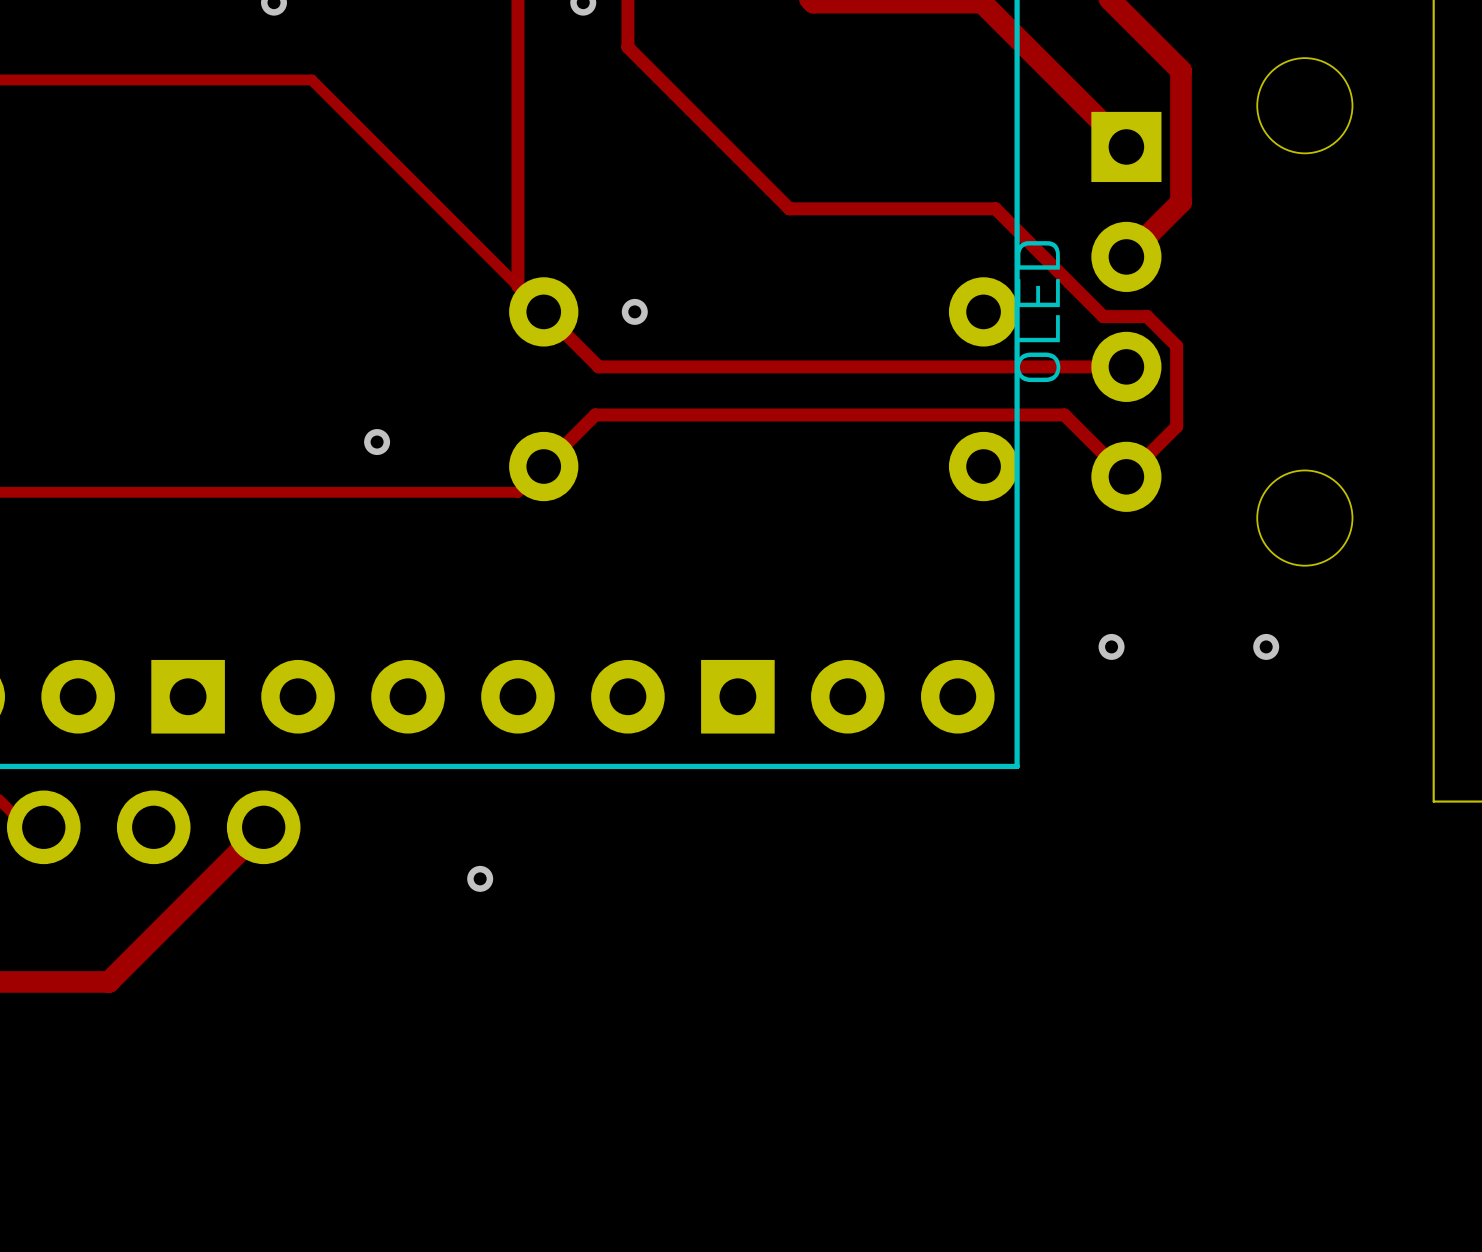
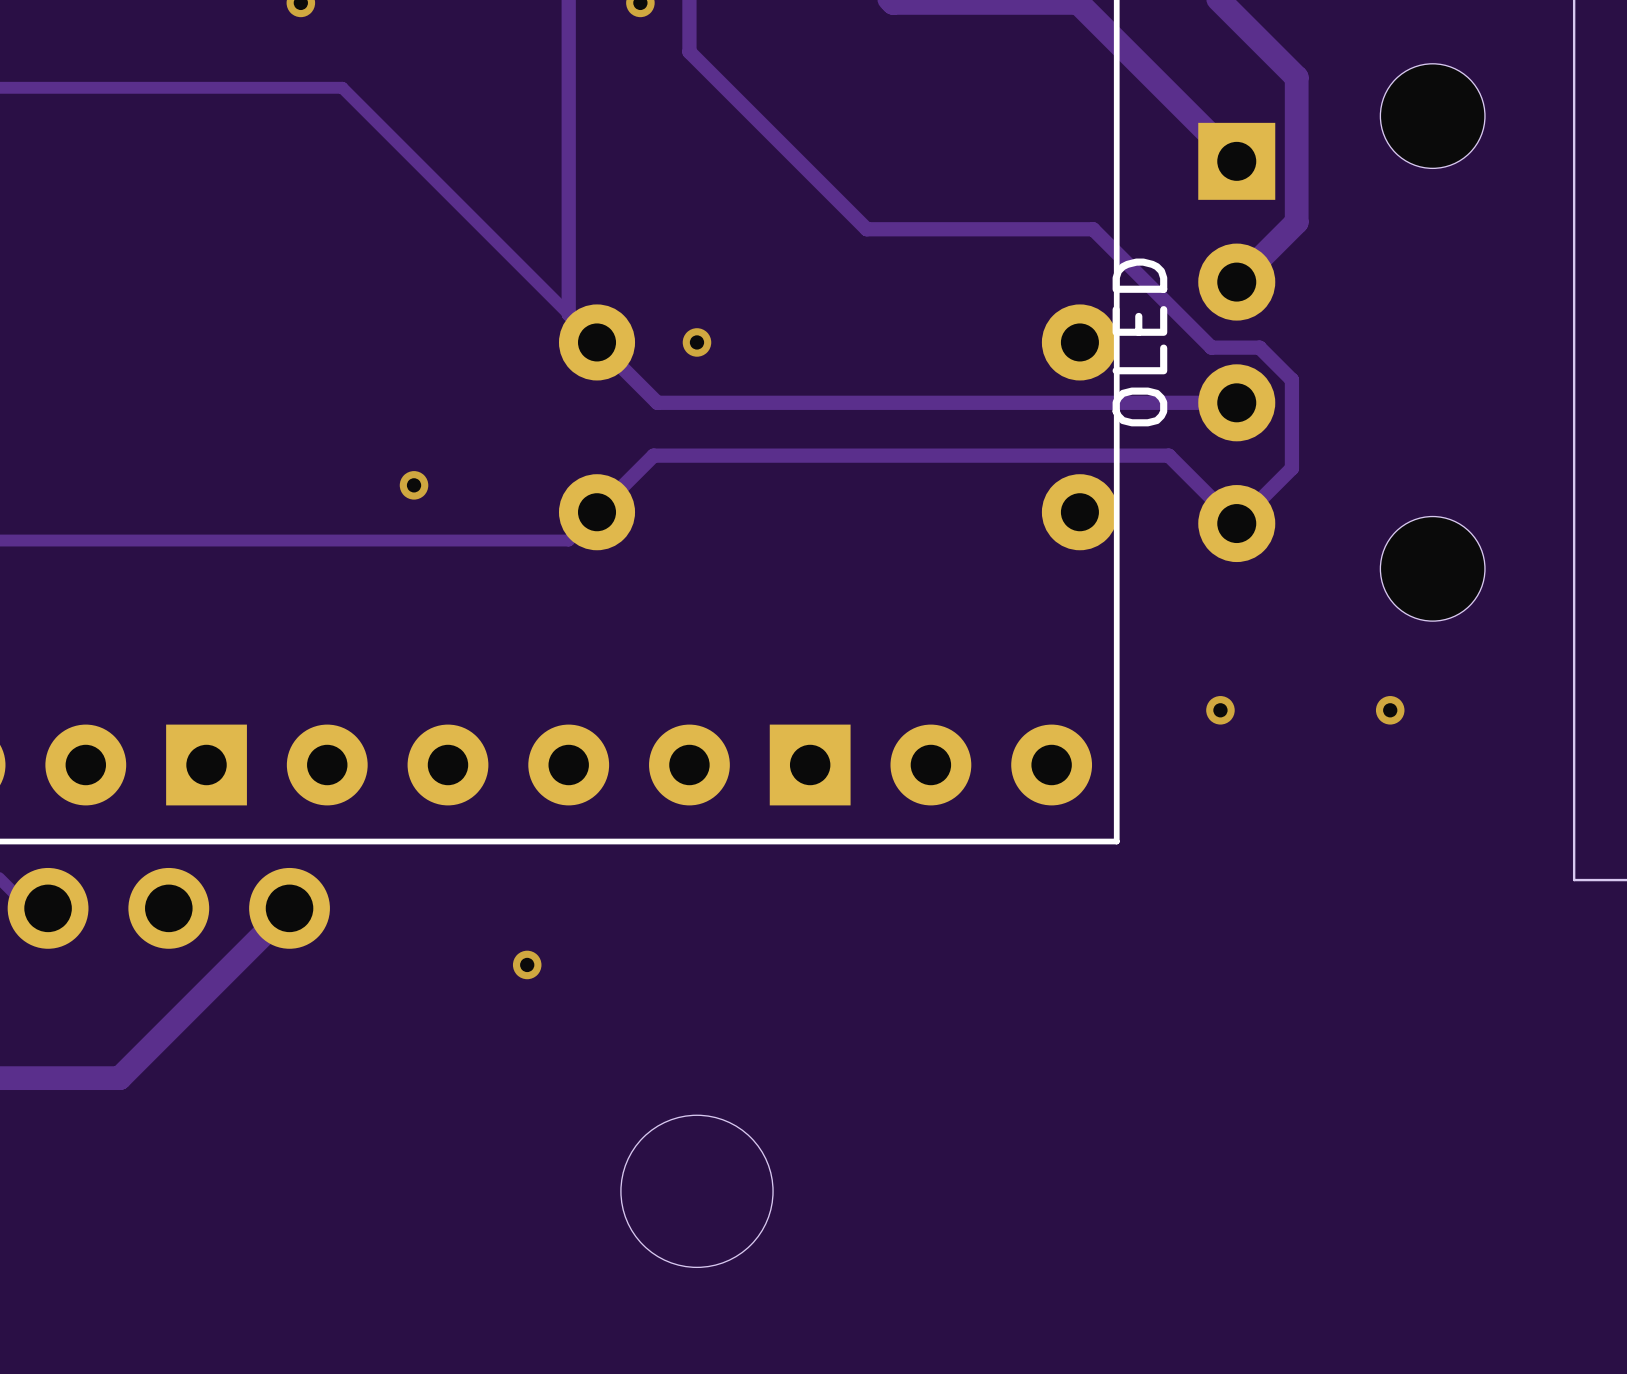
drawing: none -> [620, 1115, 774, 1268]

